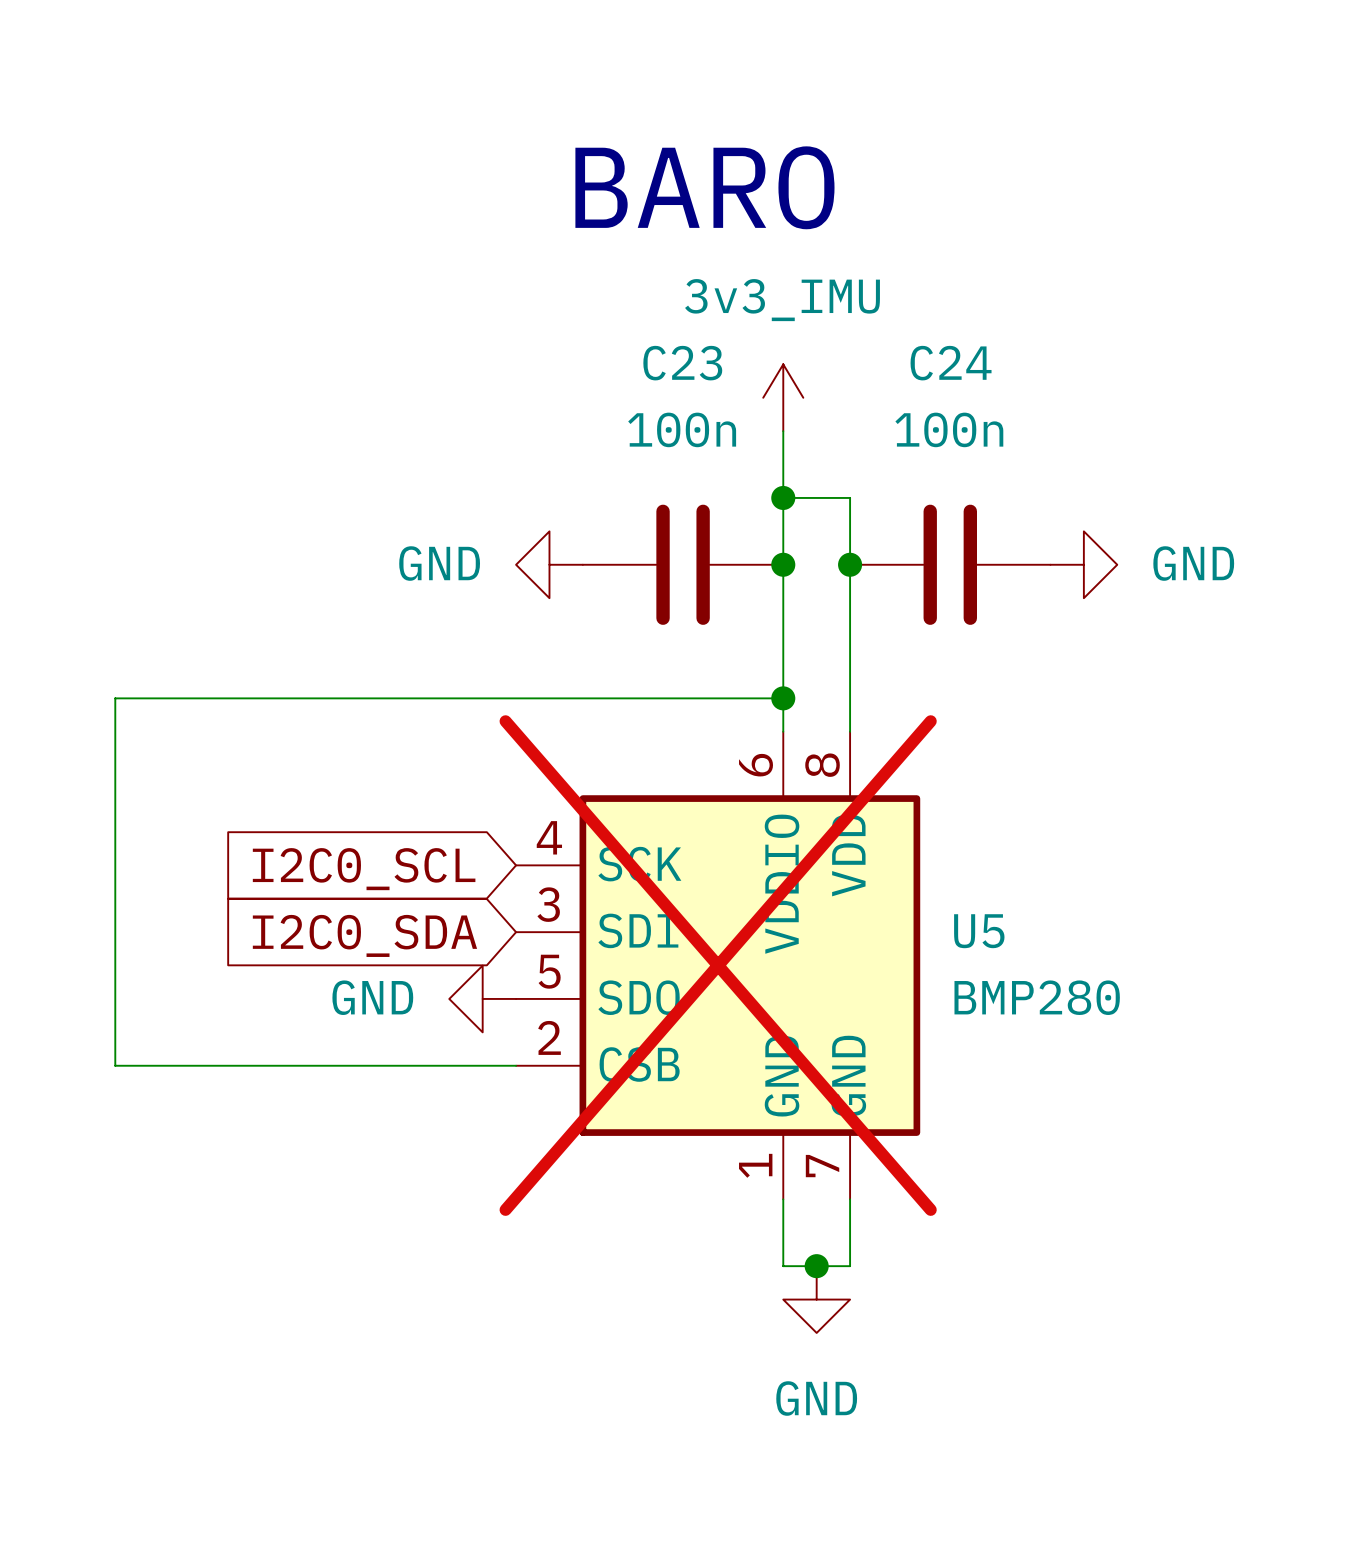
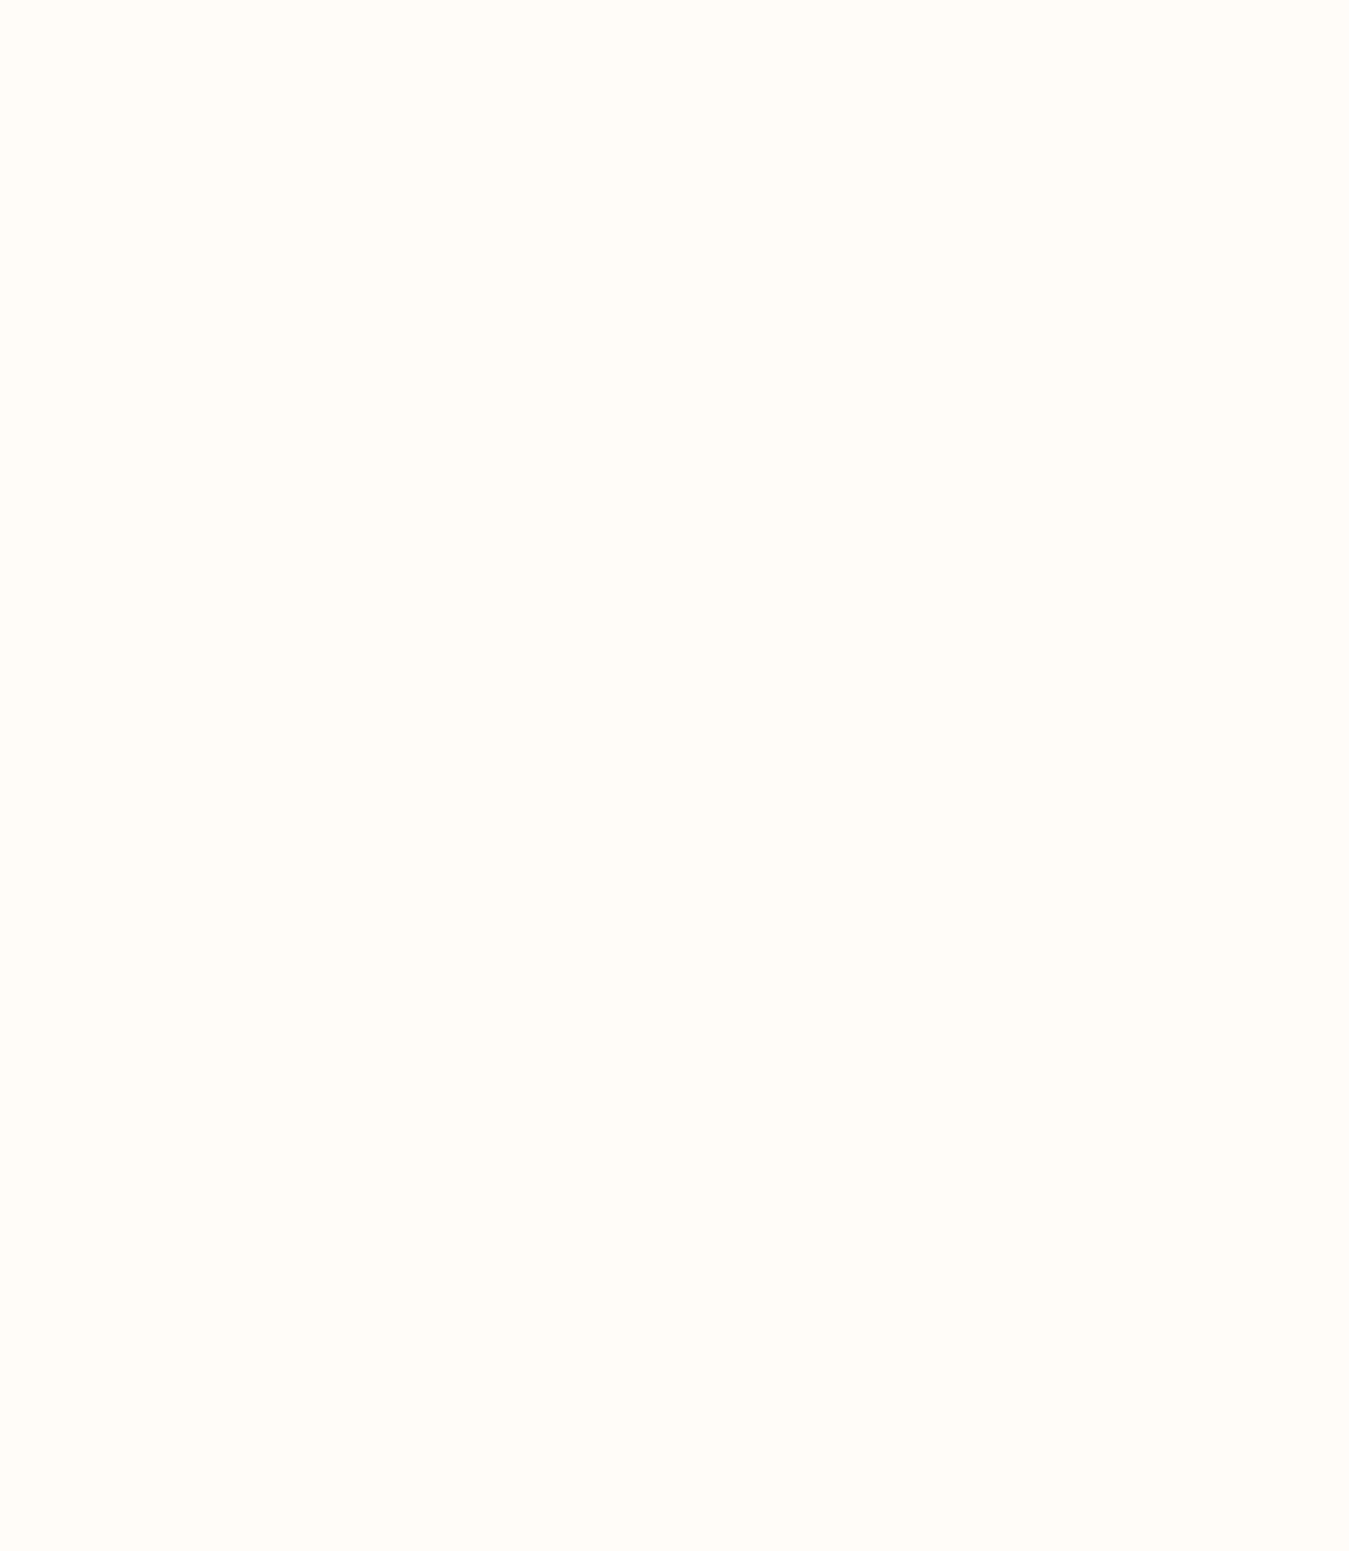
text: BARO (704, 187) -> none
power symbol: 3v3_IMU (783, 397) -> none
wire: (783, 431) (783, 731) -> none
wire: (783, 497) (850, 497) (850, 731) -> none
junction: (783, 497) -> none
power symbol: GND (549, 564) -> none
C23: 100n (683, 564) -> none
junction: (783, 564) -> none
junction: (850, 564) -> none
C24: 100n (950, 564) -> none
power symbol: GND (1083, 564) -> none
wire: (783, 698) (115, 698) (115, 1065) (516, 1065) -> none
junction: (783, 698) -> none
global label: I2C0_SCL (364, 869) -> none
global label: I2C0_SDA (364, 935) -> none
U5: BMP280 (718, 965) -> none
power symbol: GND (482, 998) -> none
wire: (783, 1199) (783, 1266) (850, 1266) (850, 1199) -> none
junction: (816, 1266) -> none
power symbol: GND (816, 1299) -> none

